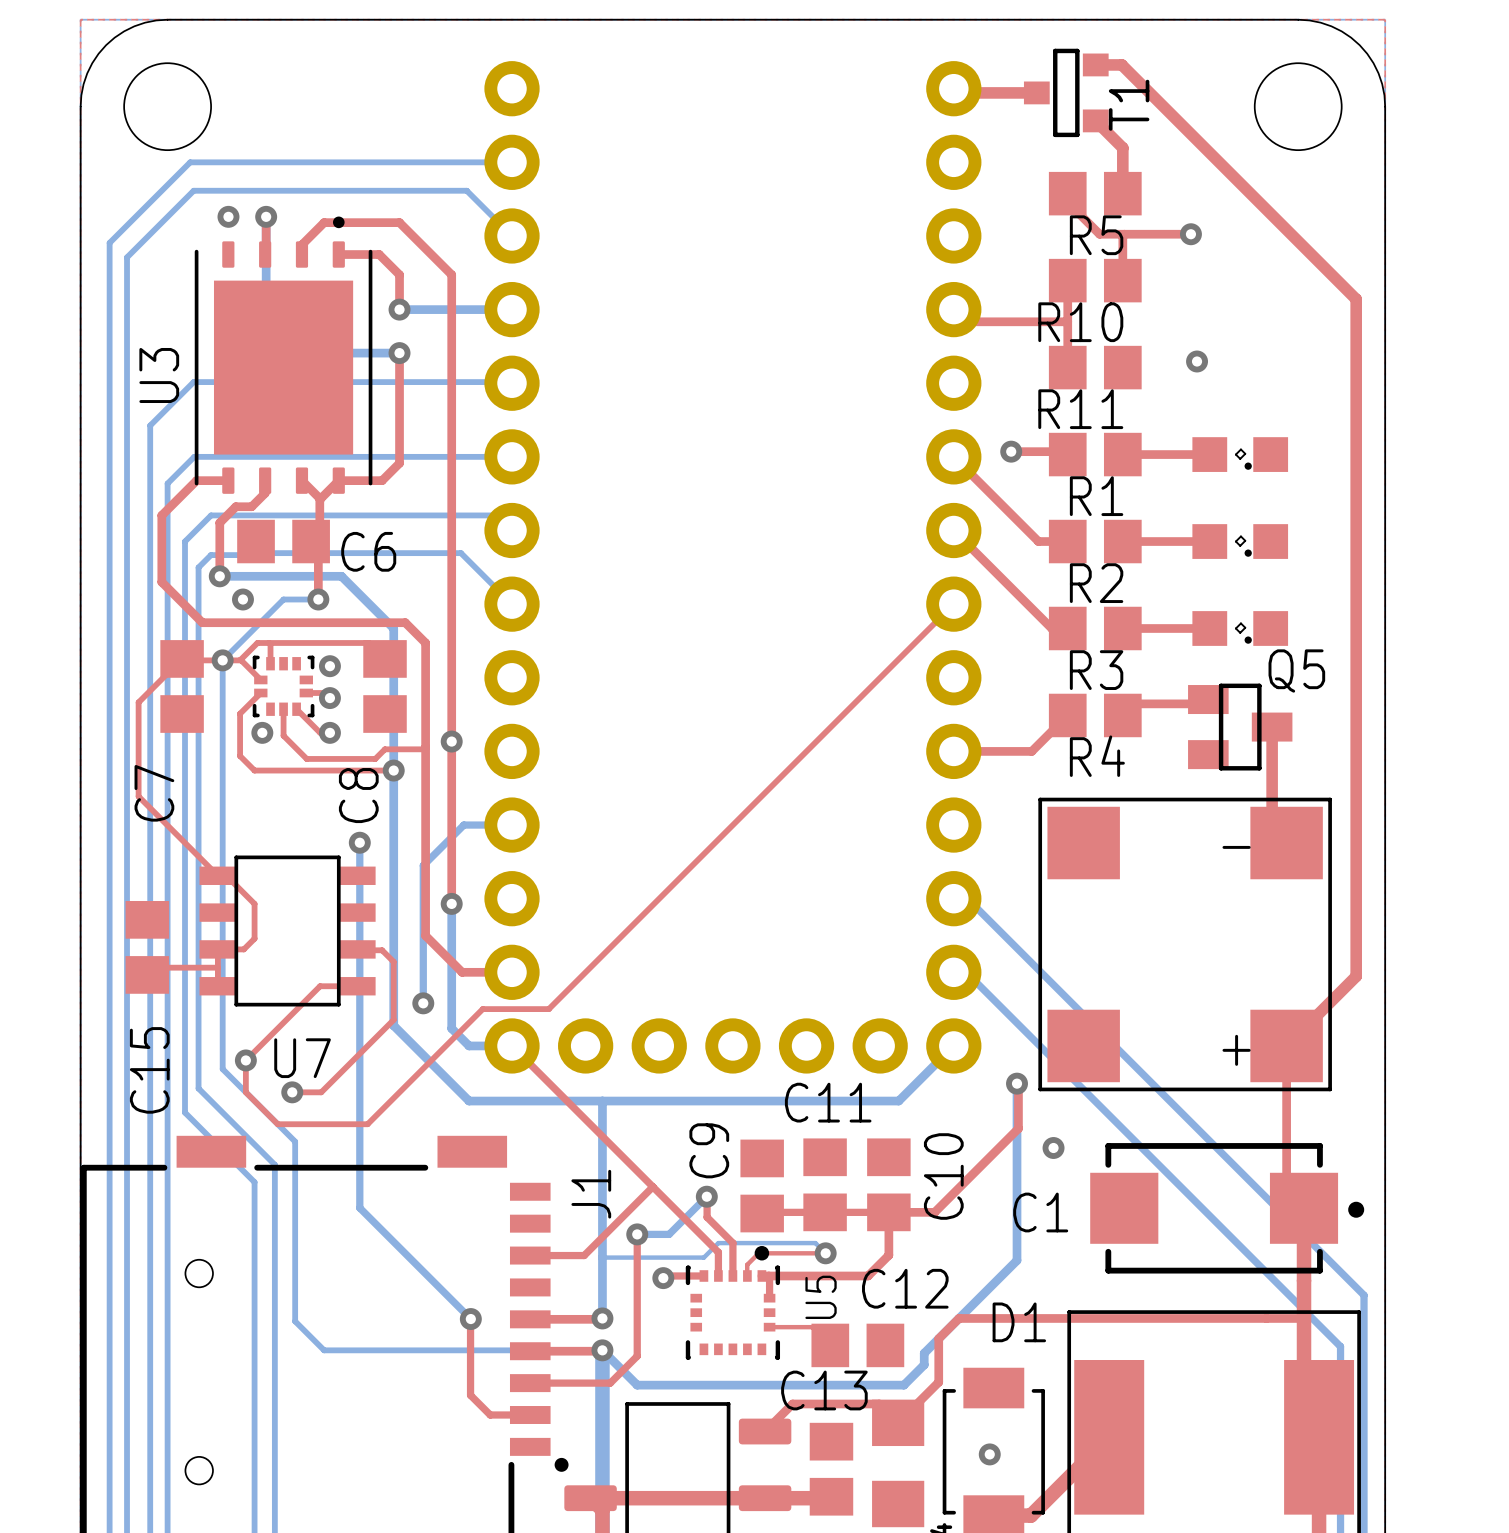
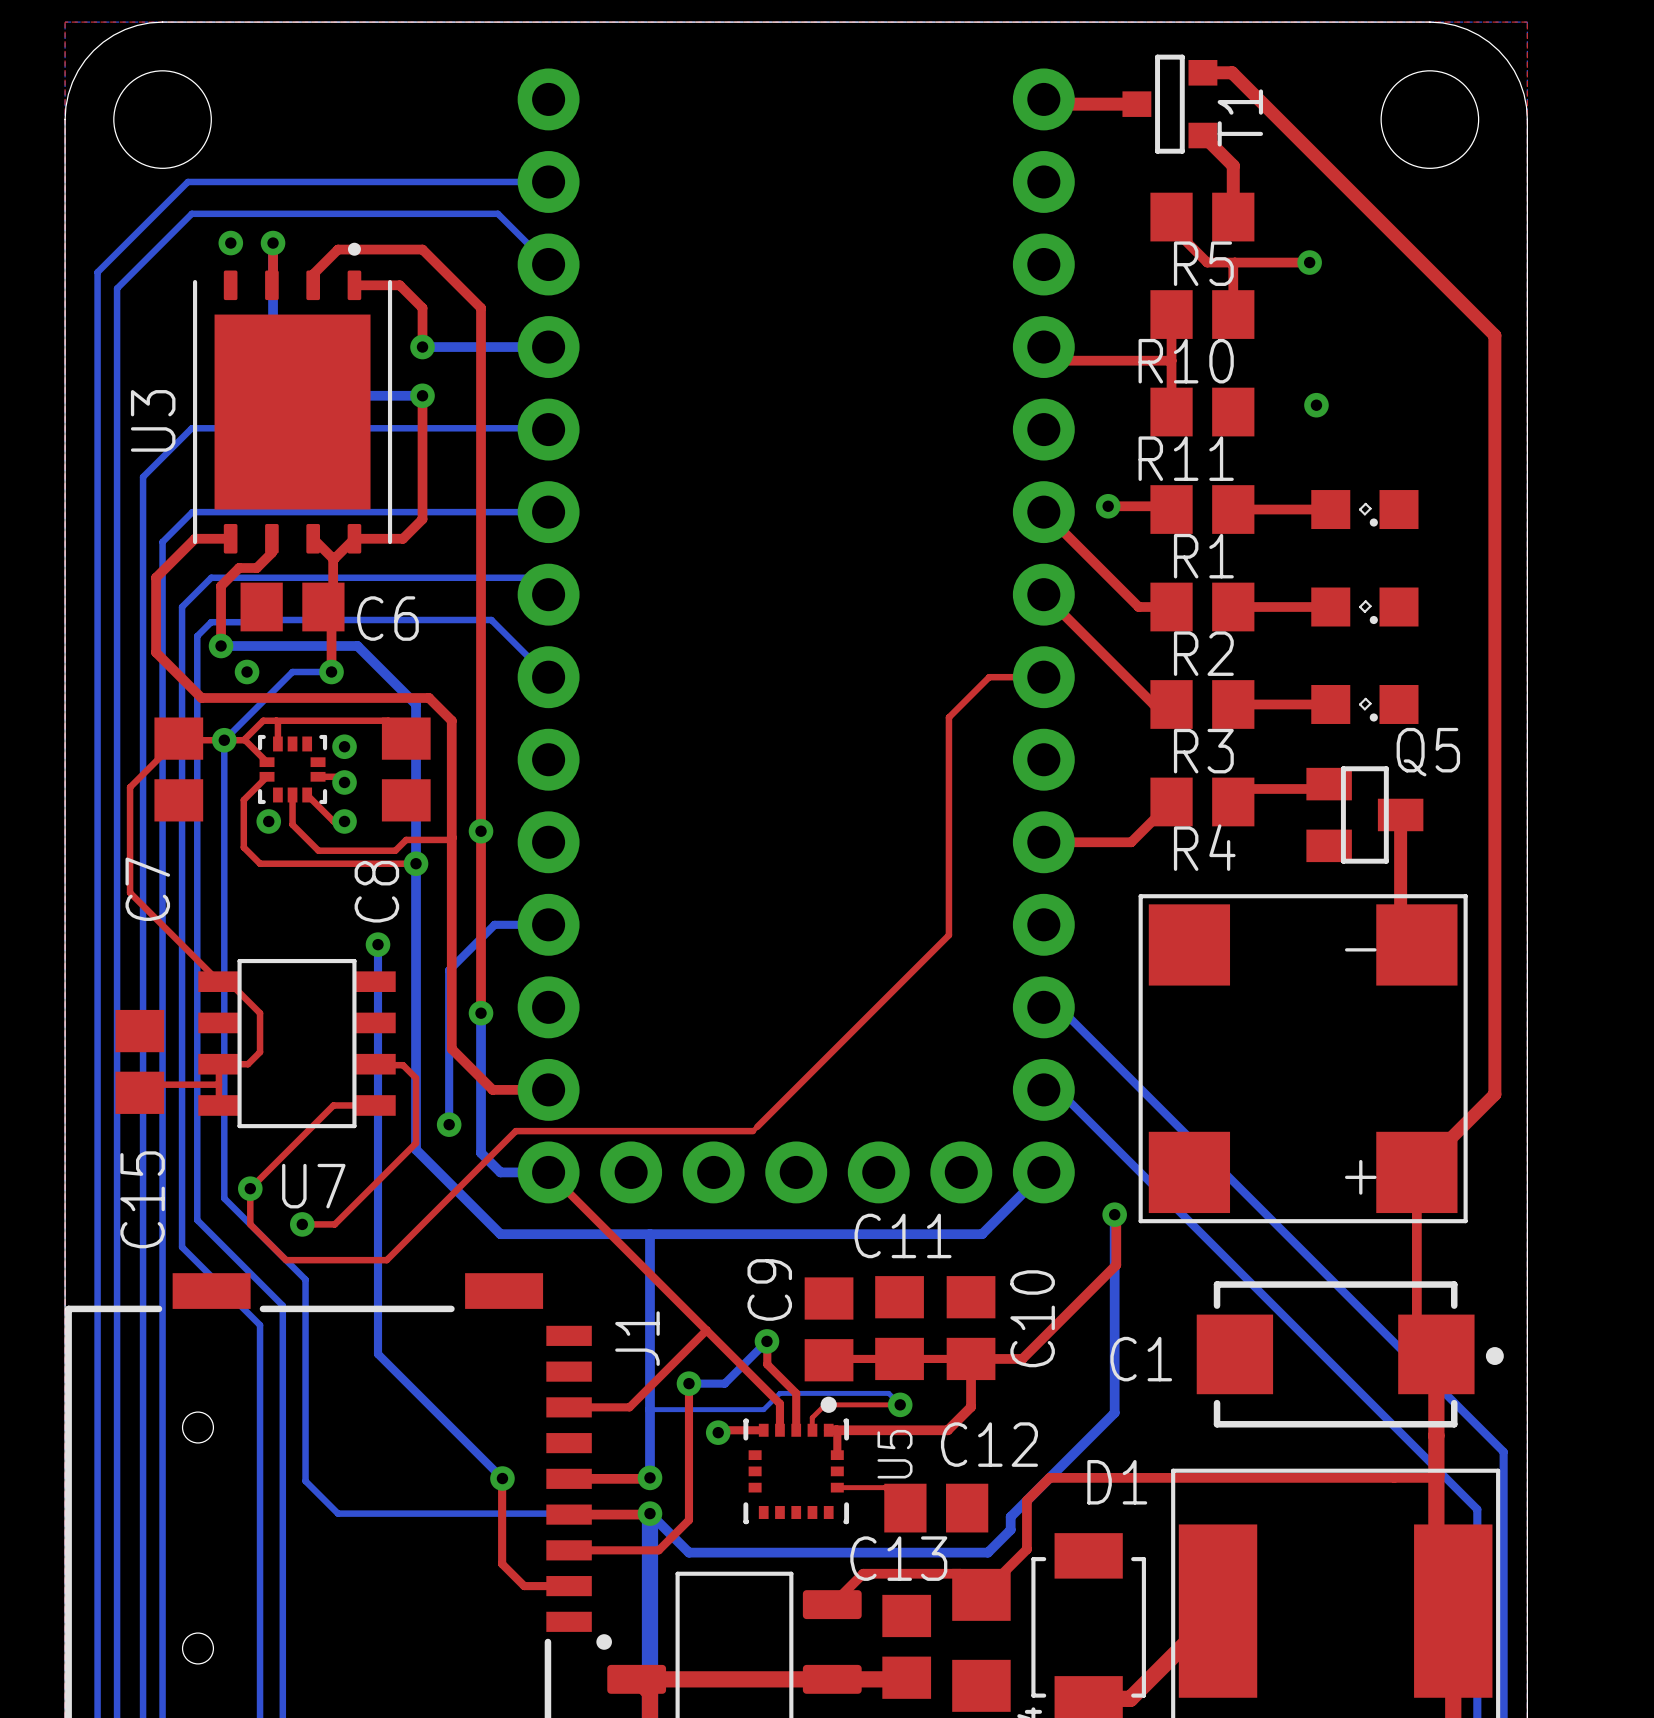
top track: (953, 604) (548, 1009) -> (1043, 677) (989, 677) (948, 717) (948, 935) (757, 1126) (753, 1131) (589, 1131)
via: (1053, 1148) -> none
via: (989, 1454) -> none

